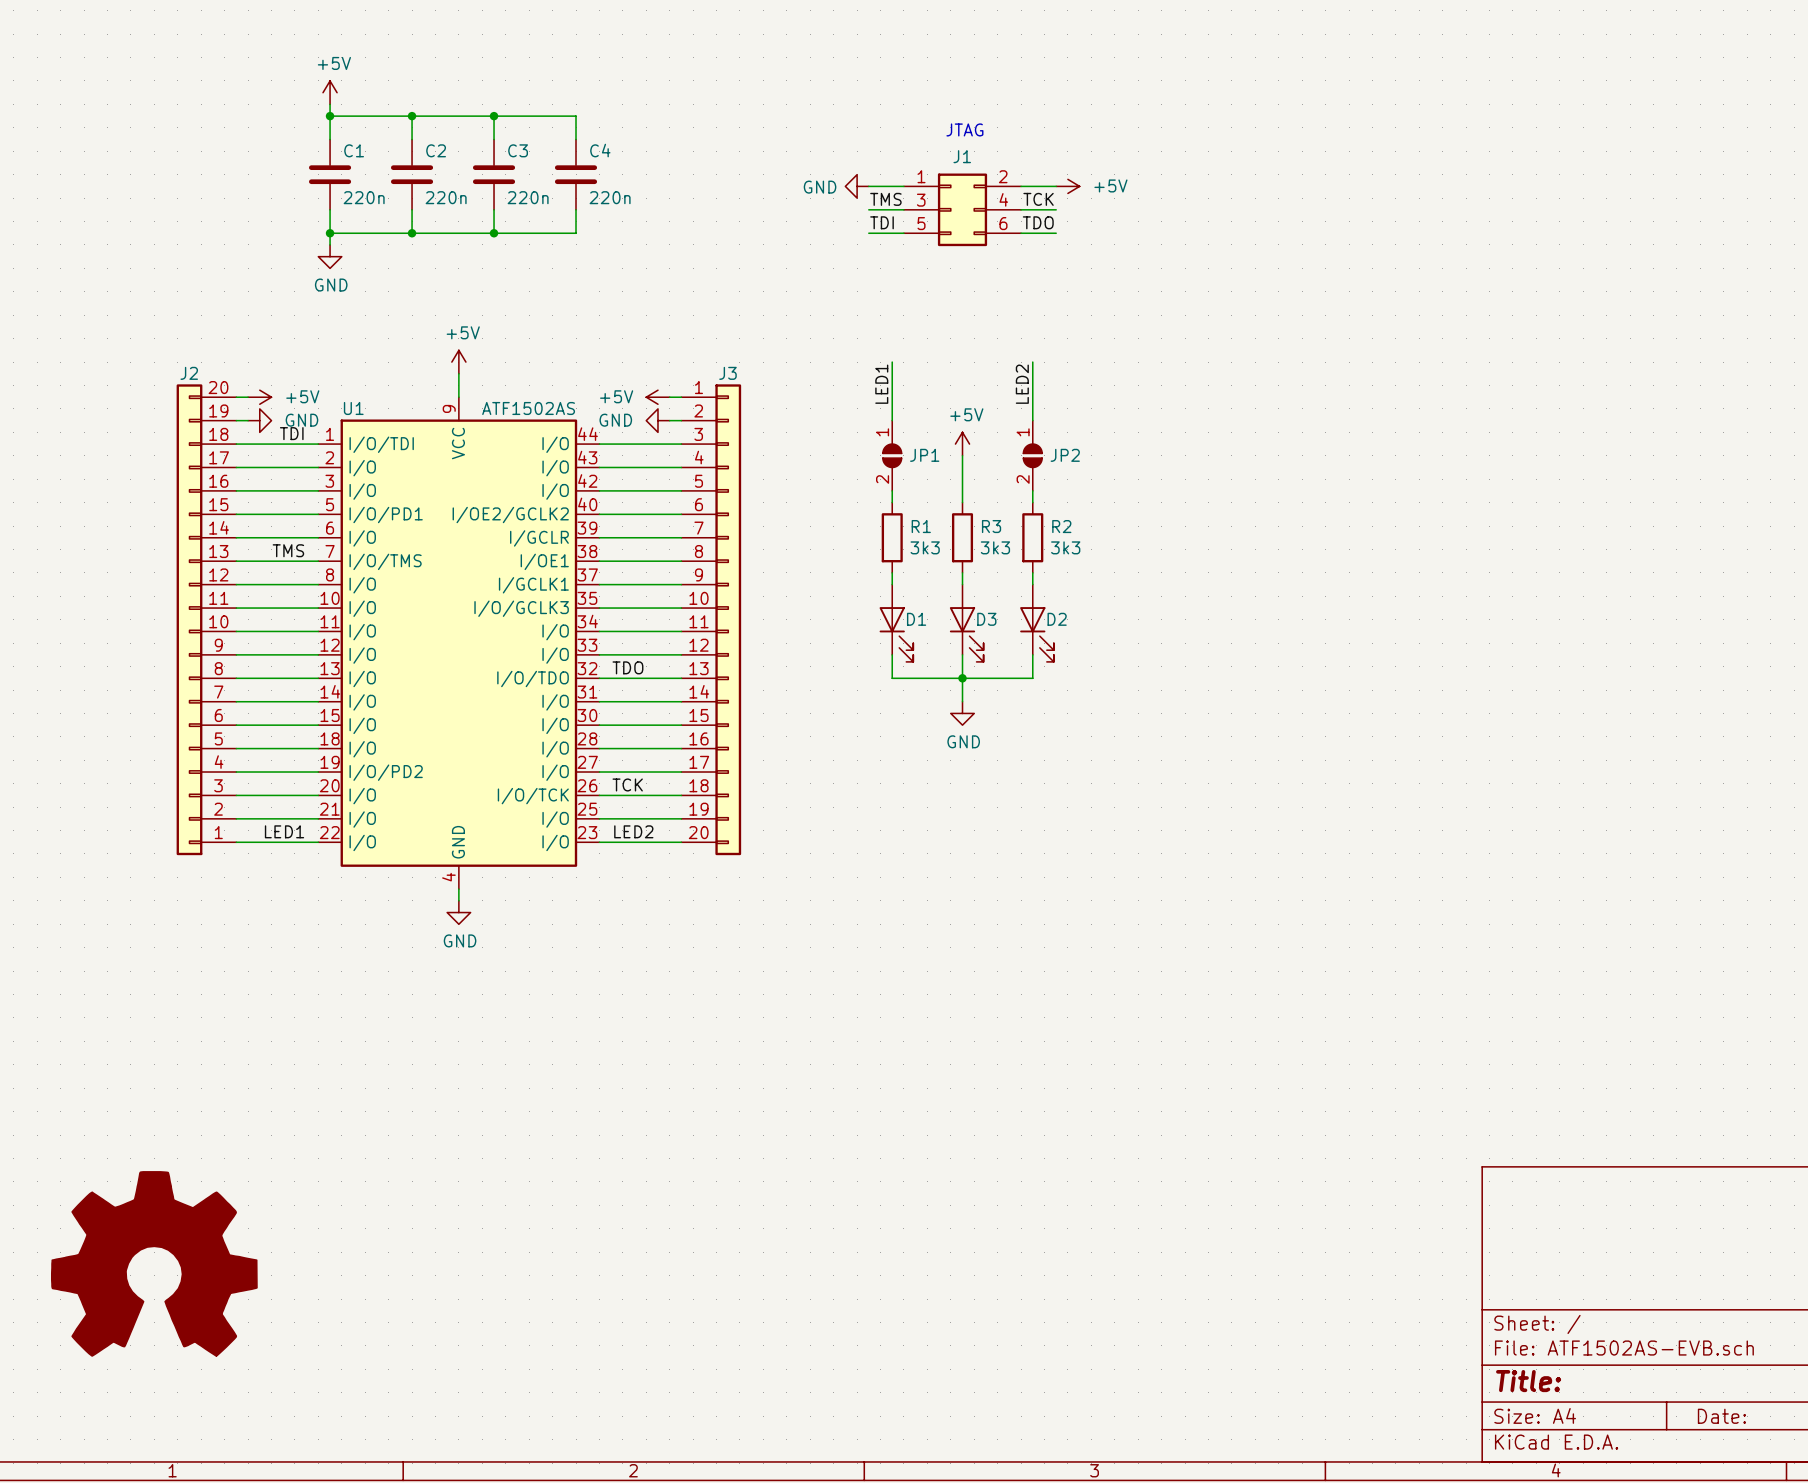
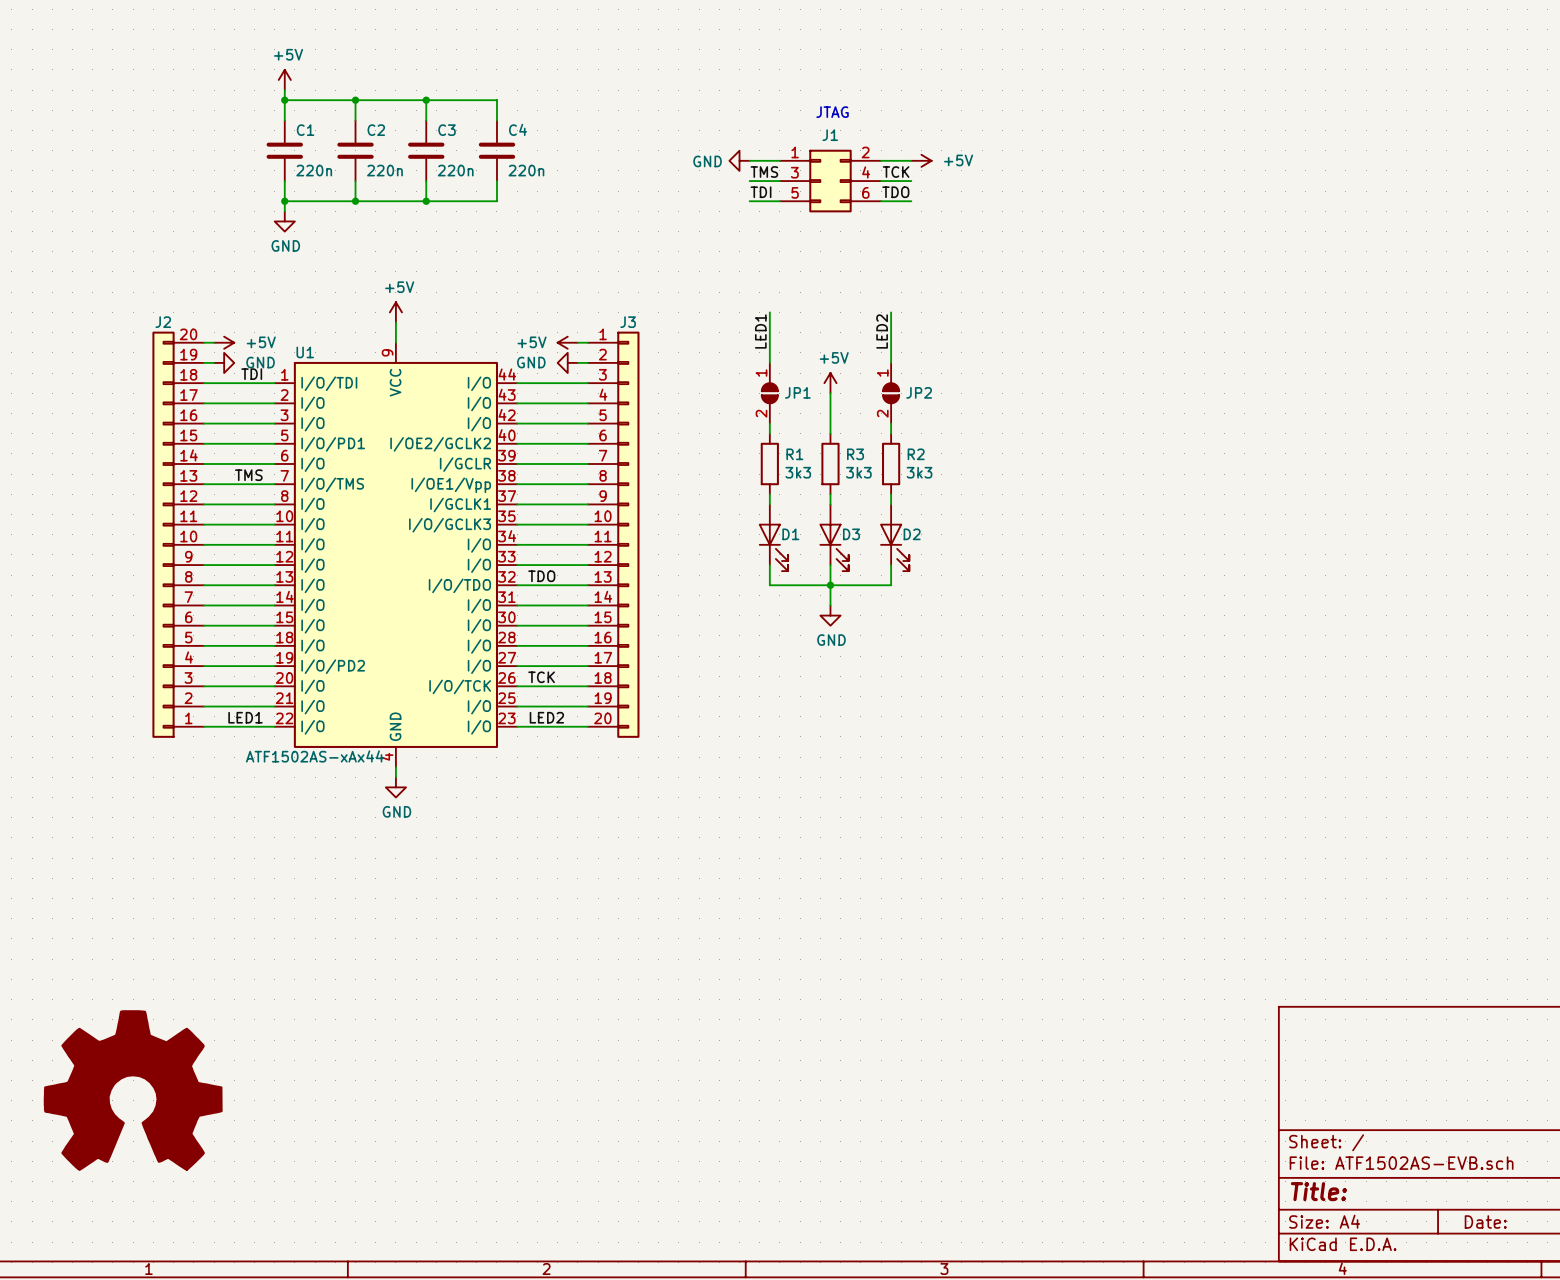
U1 value: ATF1502AS (528, 408) -> ATF1502AS-xAx44 (314, 756)
U1 pin name: I/OE1 (544, 561) -> I/OE1/Vpp (451, 485)

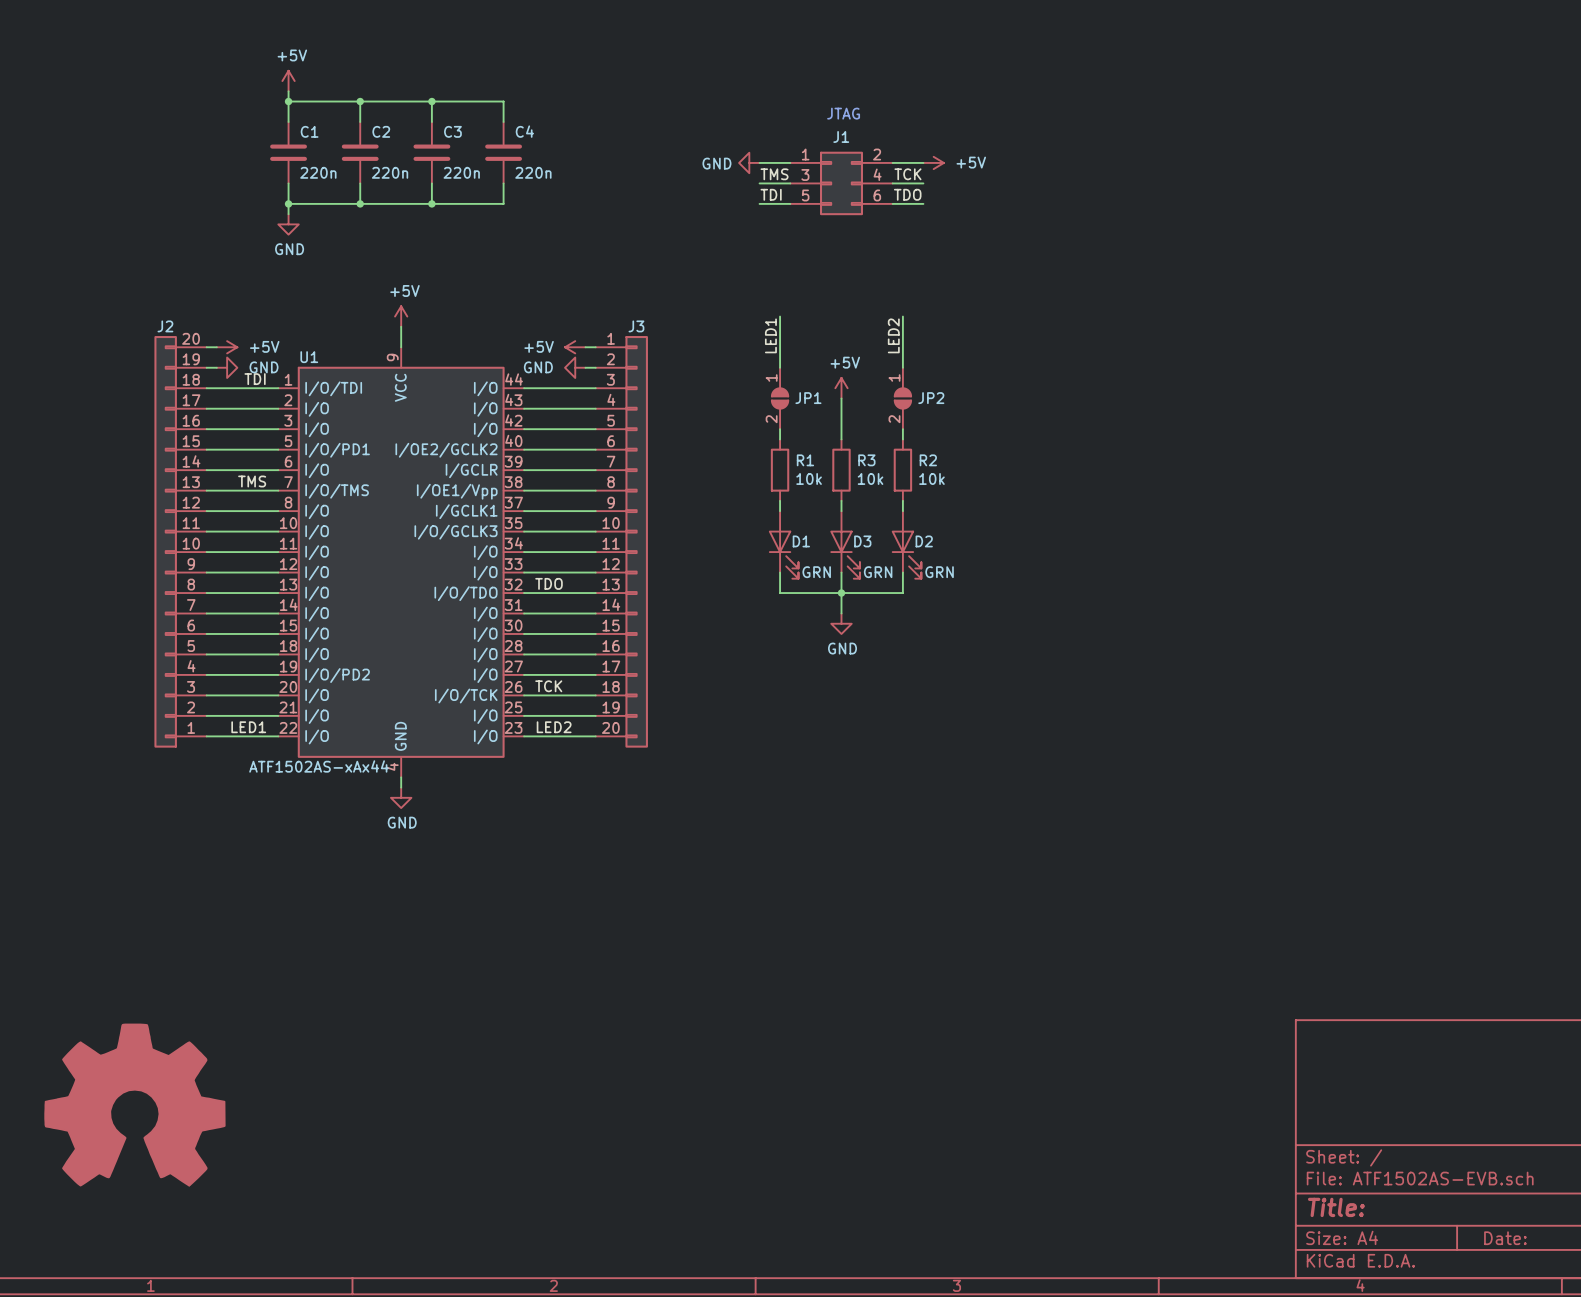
R1 value: 3k3 (798, 472) -> 10k (809, 478)
R3 value: 3k3 (858, 472) -> 10k (870, 478)
R2 value: 3k3 (919, 472) -> 10k (931, 478)
D1 value: none -> GRN (816, 572)
D3 value: none -> GRN (878, 572)
D2 value: none -> GRN (939, 572)

